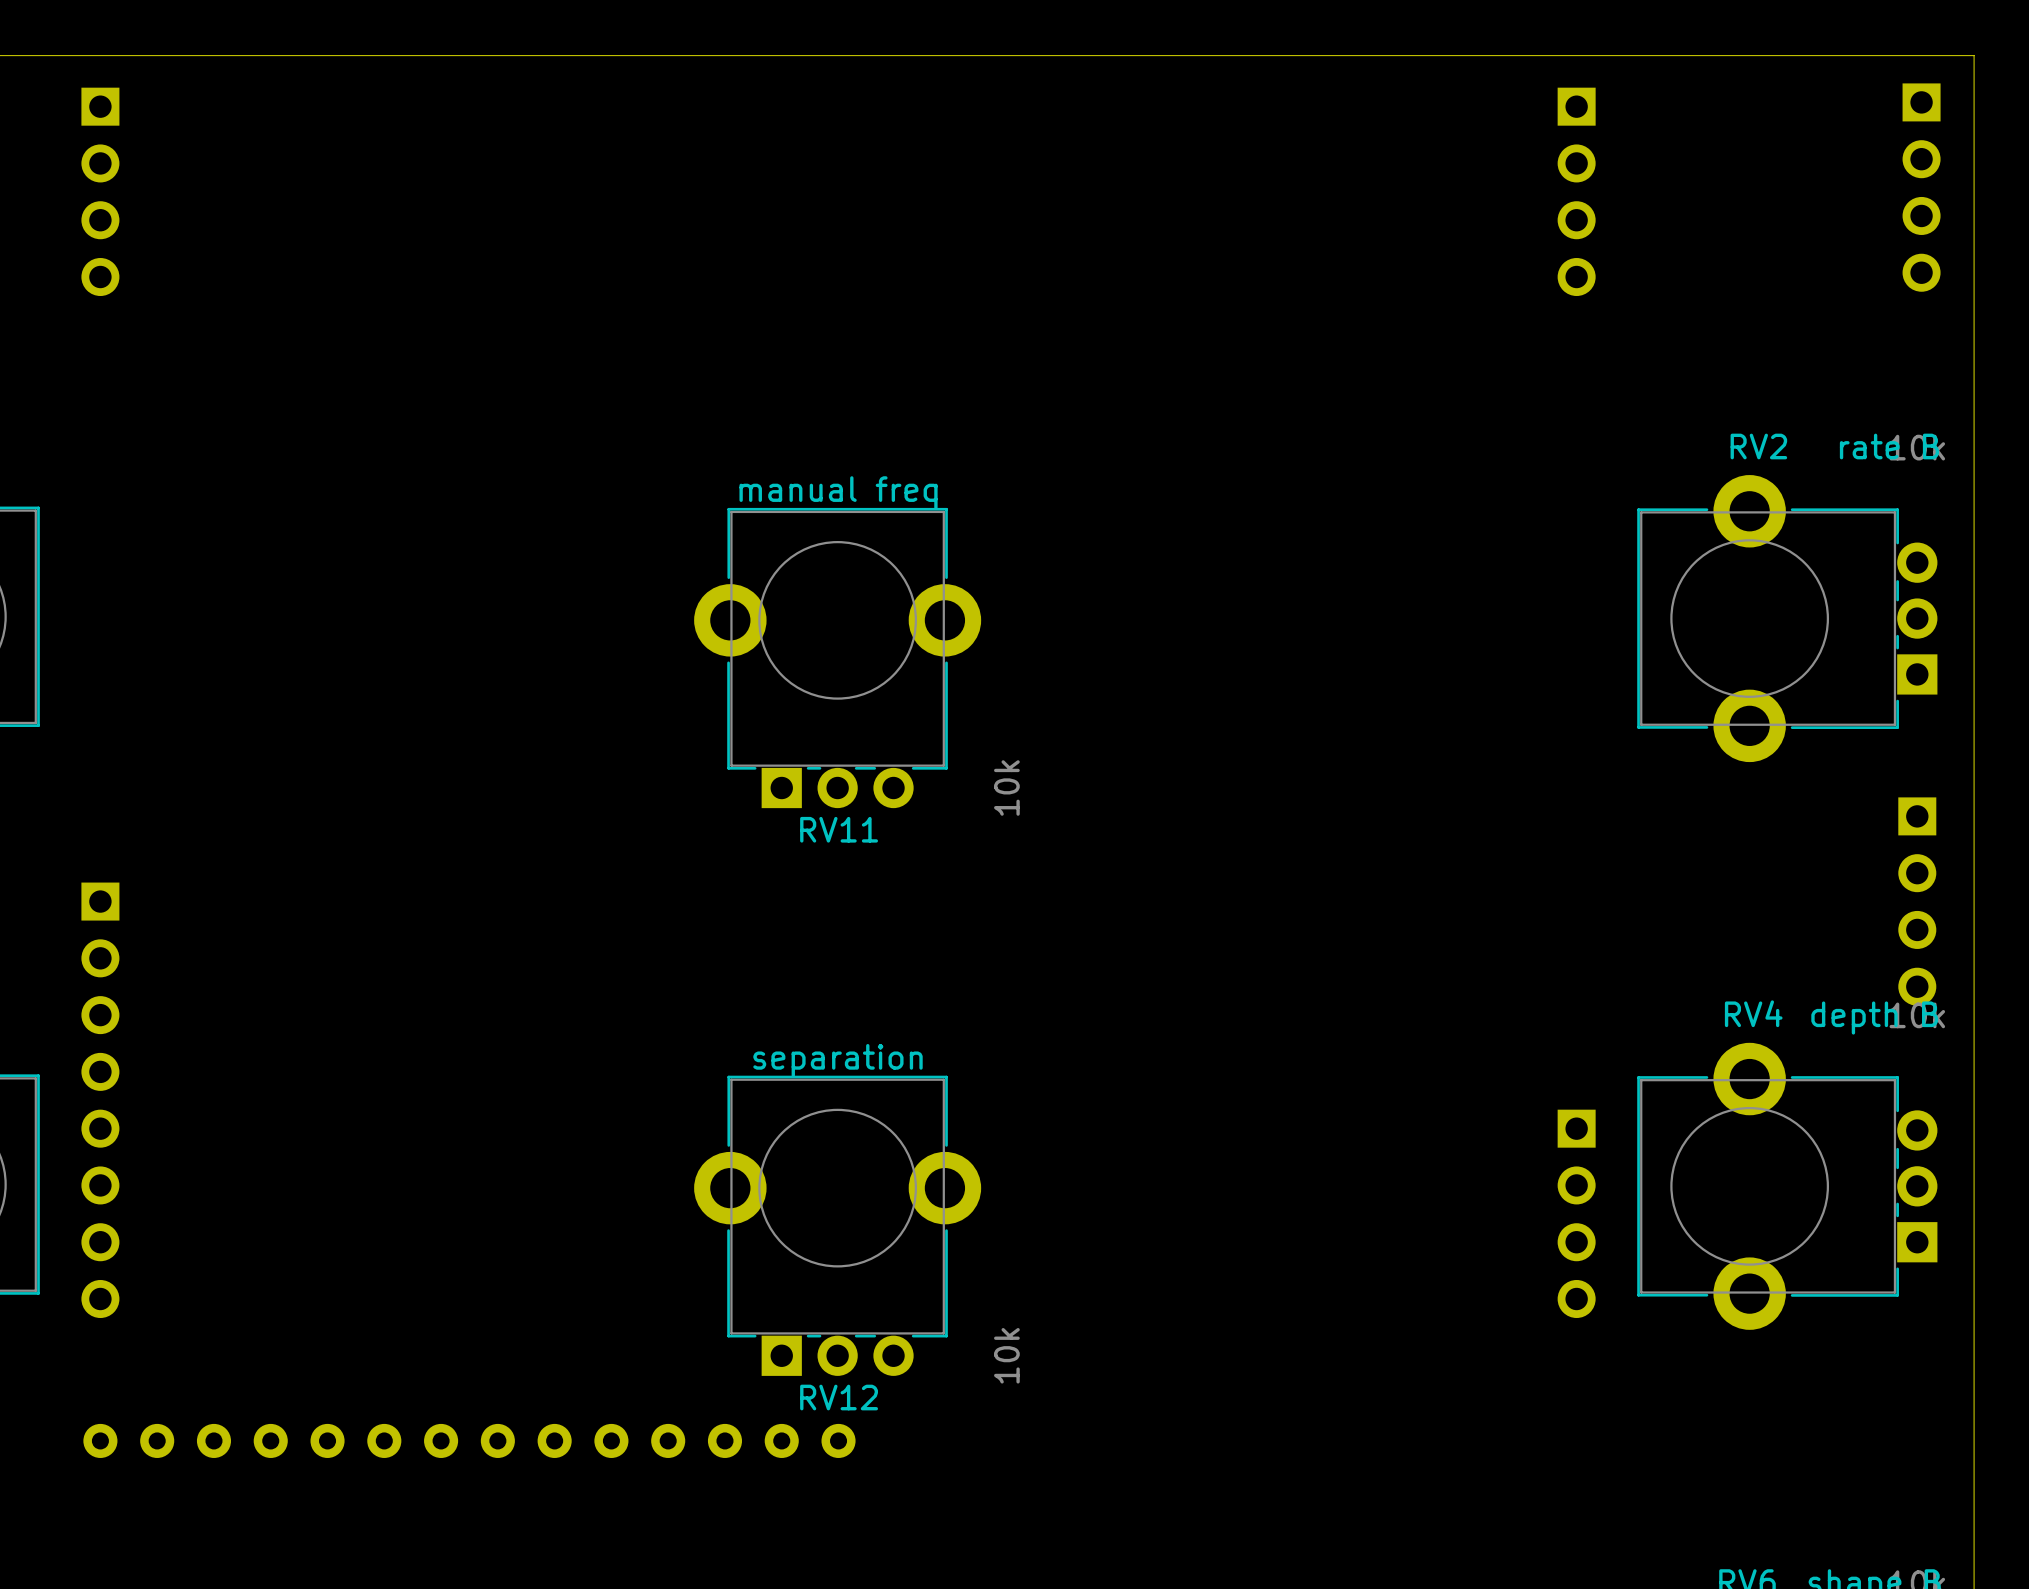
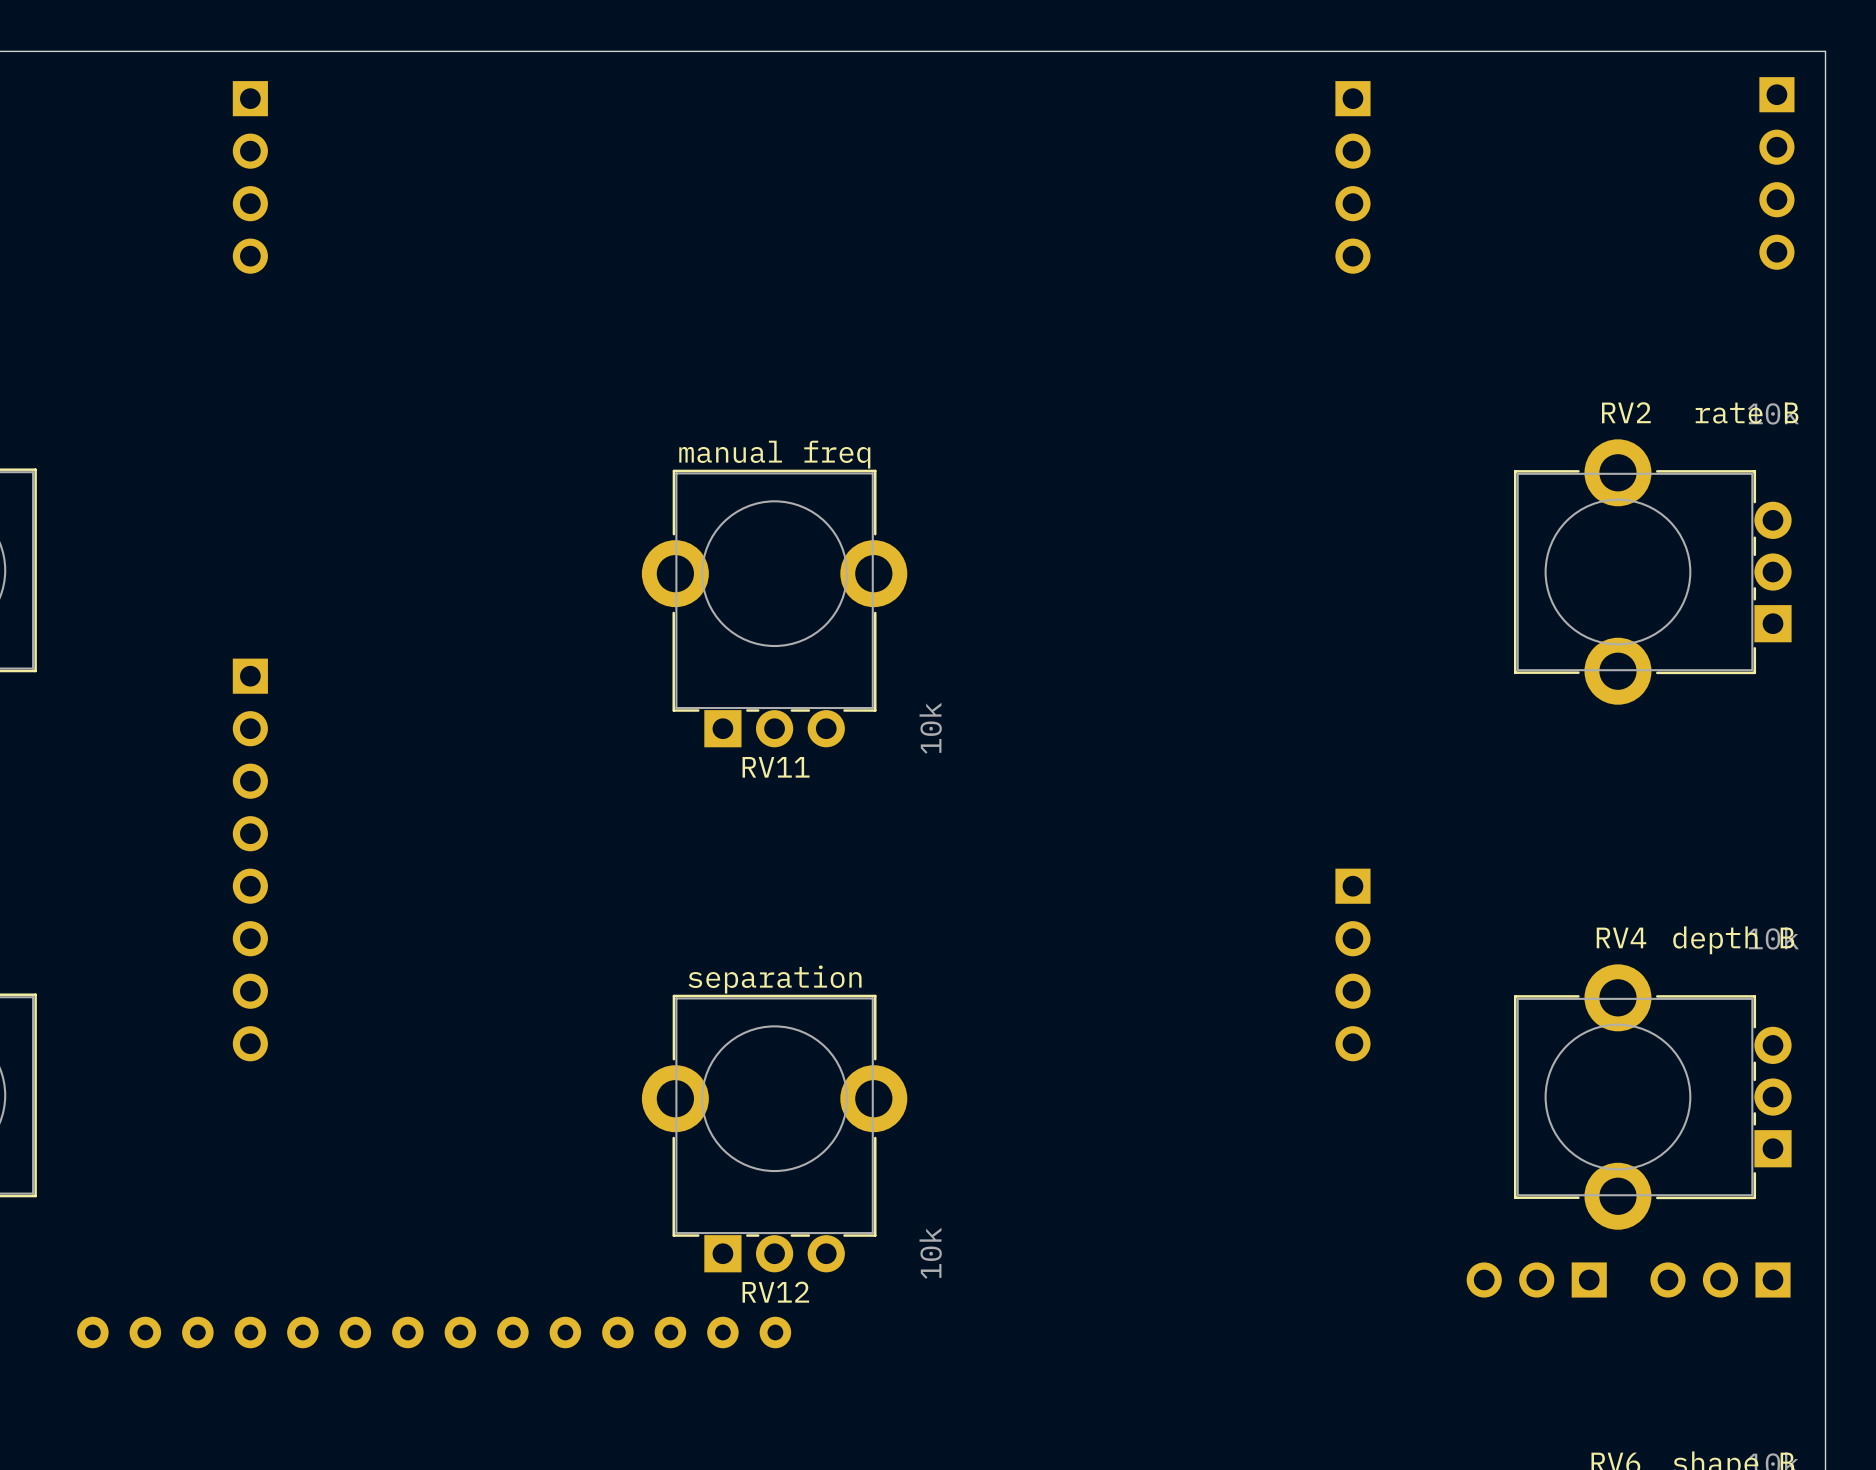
part position: (100, 191) -> (250, 177)
part position: (1576, 191) -> (1352, 177)
part: (1917, 901) -> none
part position: (100, 1100) -> (250, 859)
part position: (1576, 1213) -> (1352, 964)
part: none -> (1536, 1279)
part: none -> (1720, 1279)

